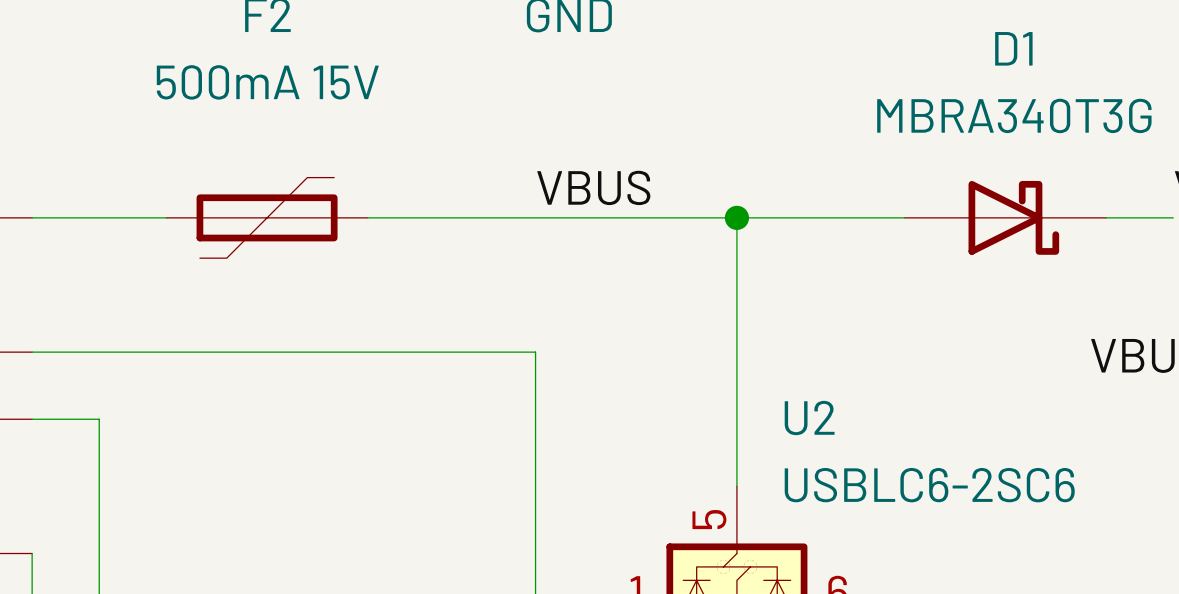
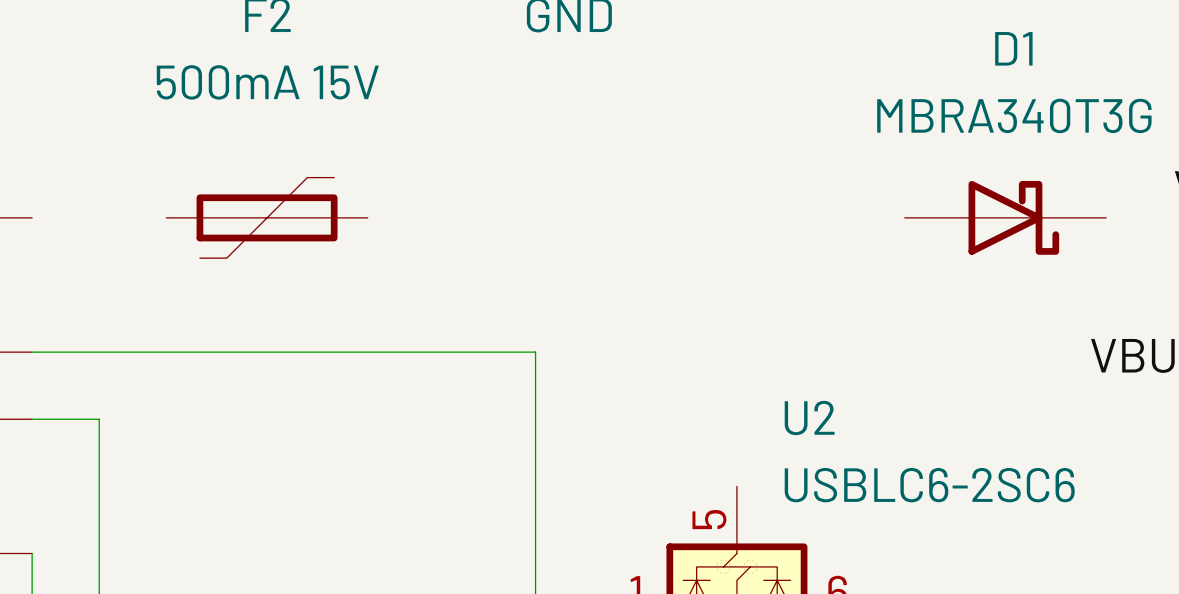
label: VBUS (593, 187) -> none
wire: (32, 217) (166, 217) -> none
wire: (367, 217) (904, 217) -> none
wire: (736, 217) (736, 486) -> none
junction: (736, 217) -> none
wire: (1106, 217) (1173, 217) -> none

